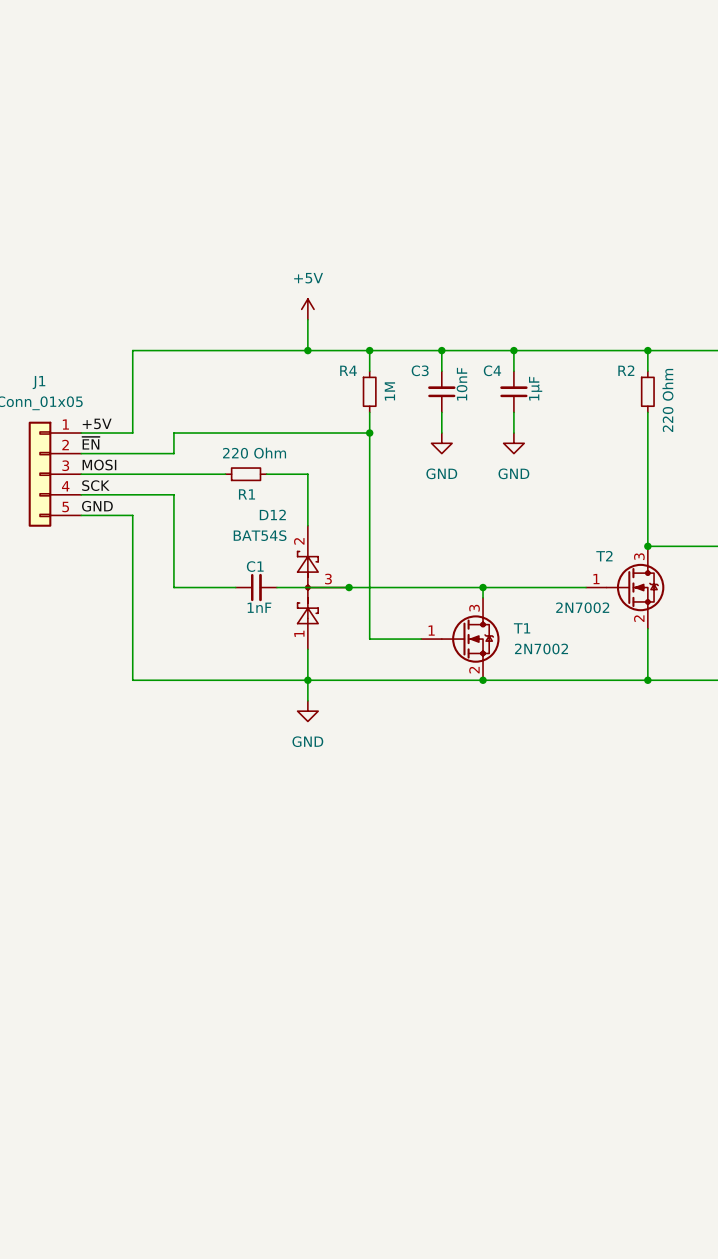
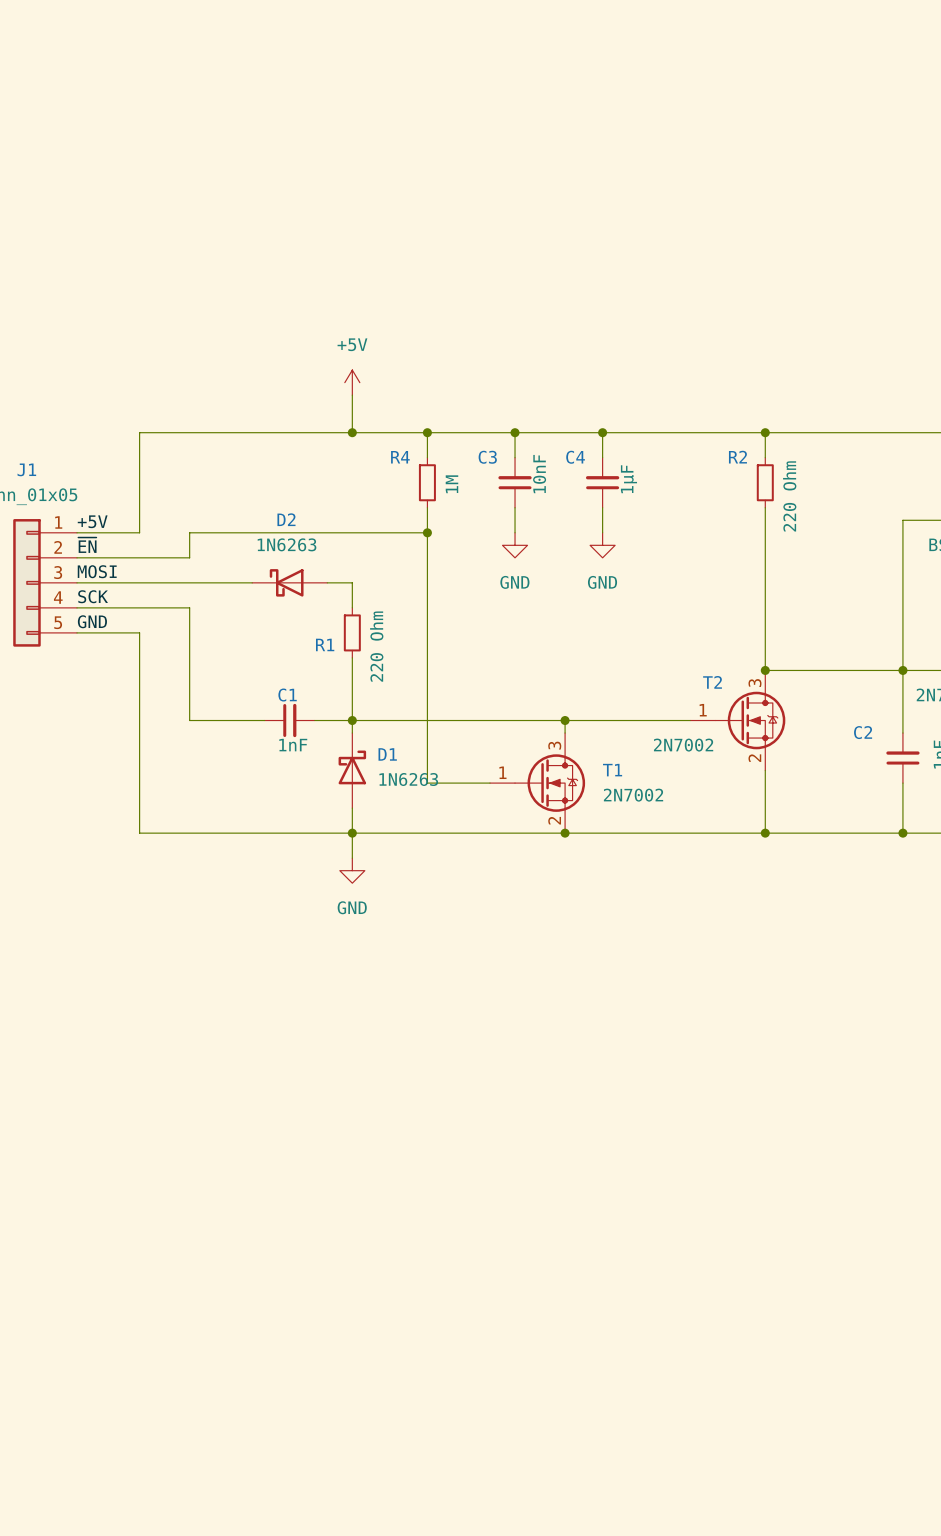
R1 rotation: 0° (246, 474) -> 90° clockwise (352, 632)
R1 position: (246, 474) -> (352, 632)
D2: none -> 1N6263 (289, 582)
wire: (307, 494) (307, 525) -> none
D12: BAT54S (323, 587) -> none
junction position: (349, 587) -> (352, 720)
D1: none -> 1N6263 (352, 770)

